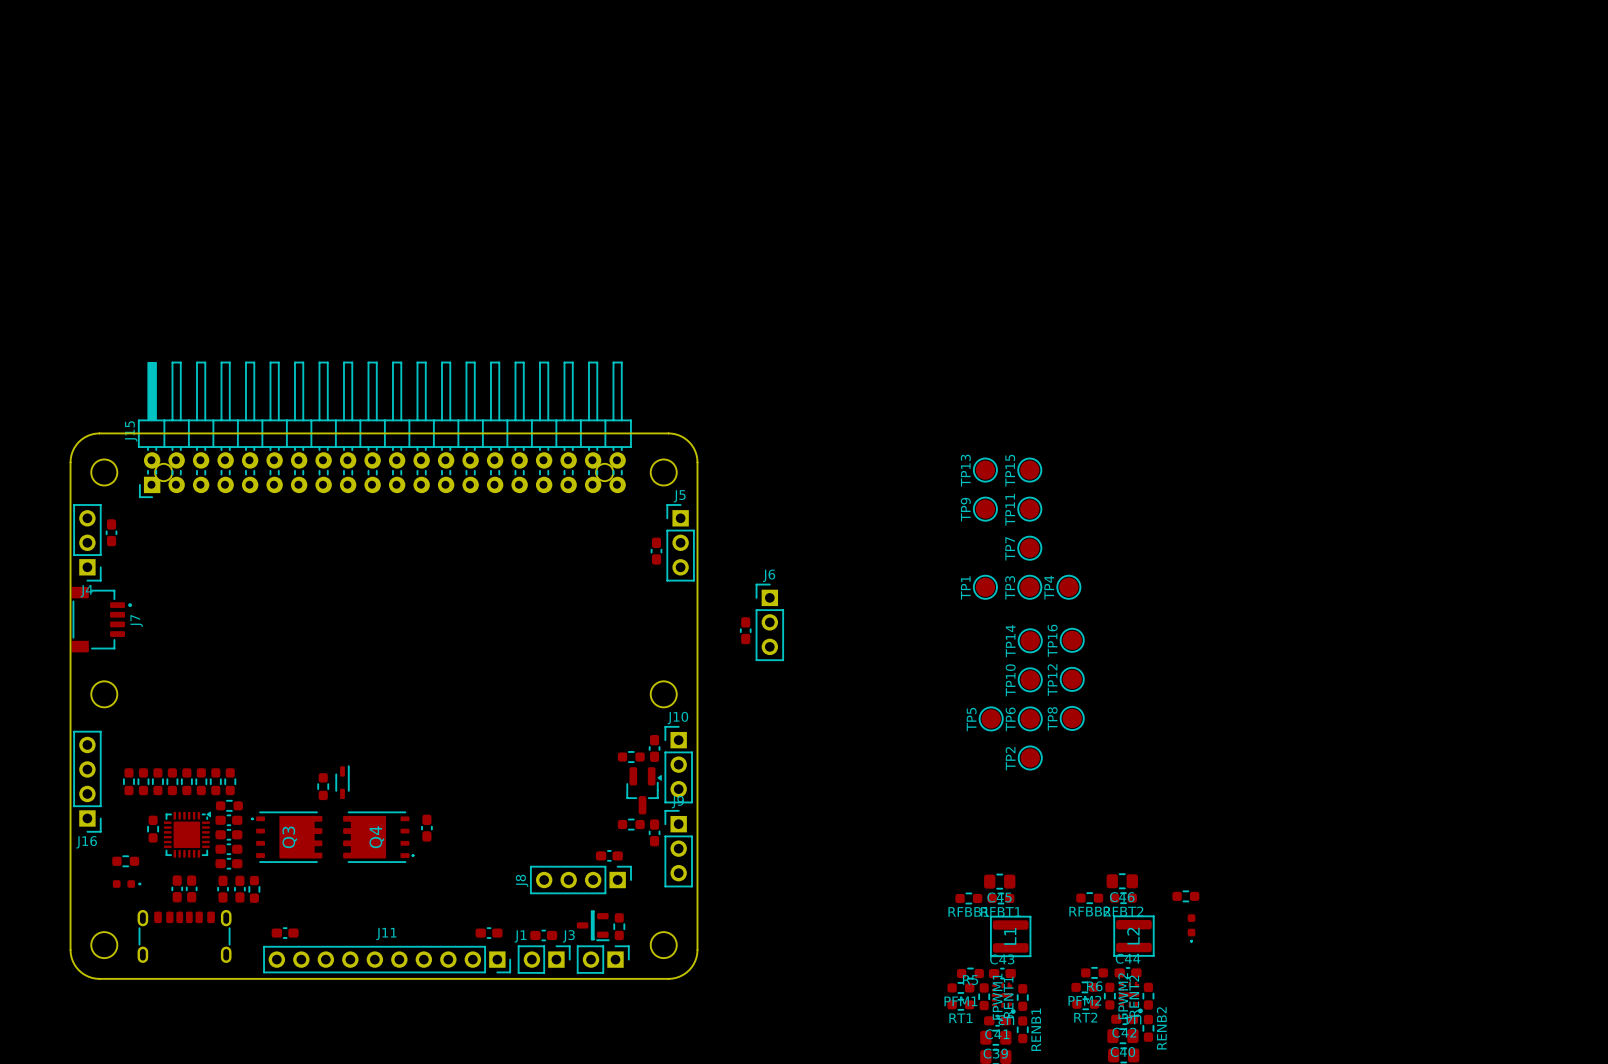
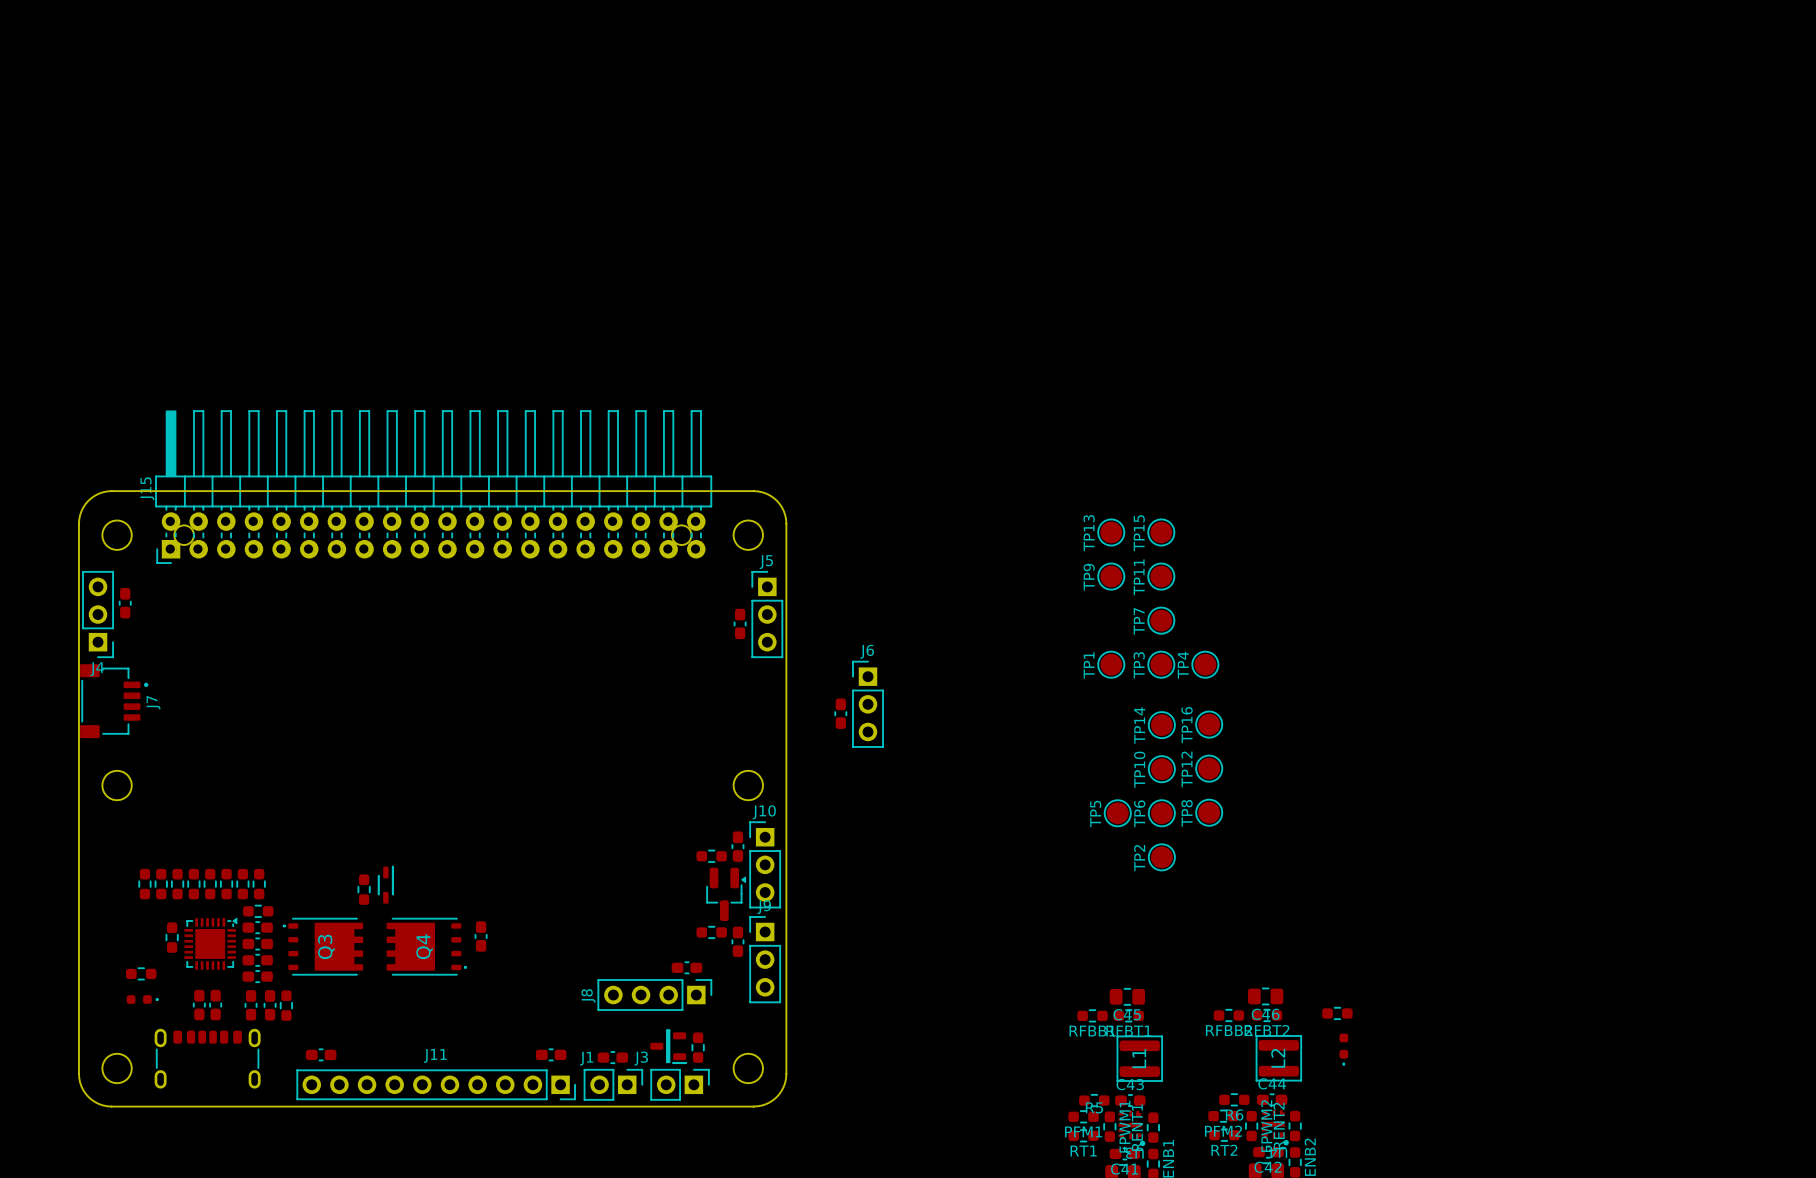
J16: (87, 781) -> none

